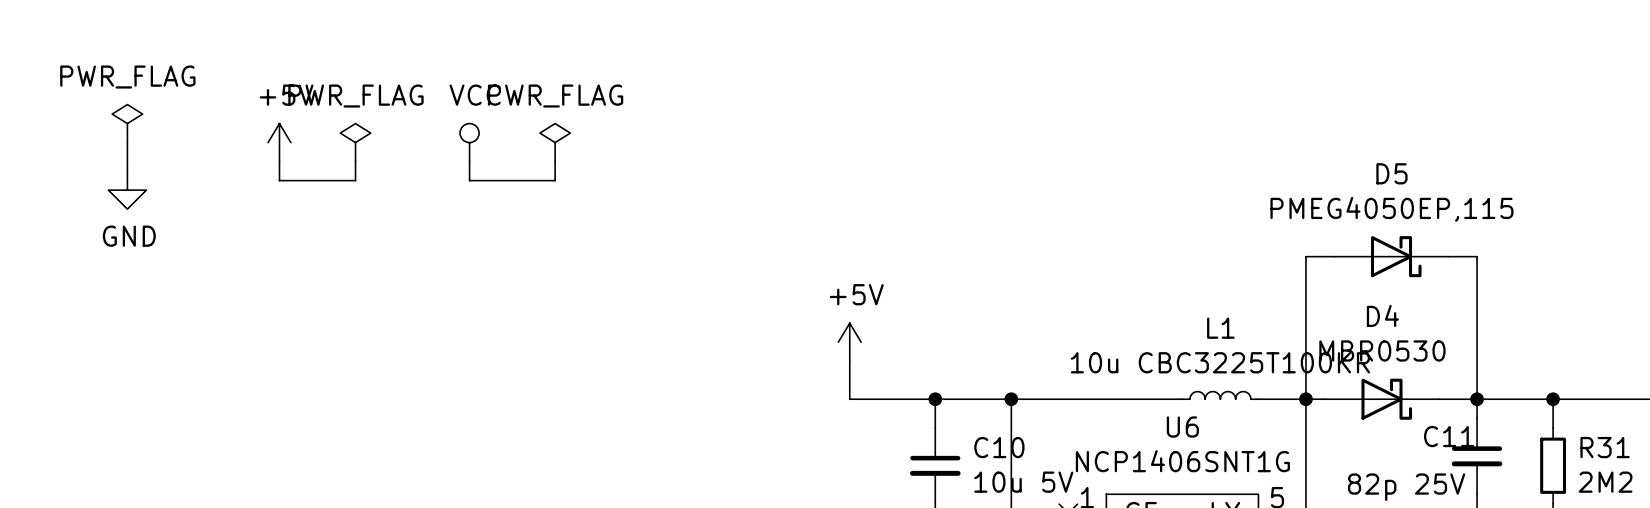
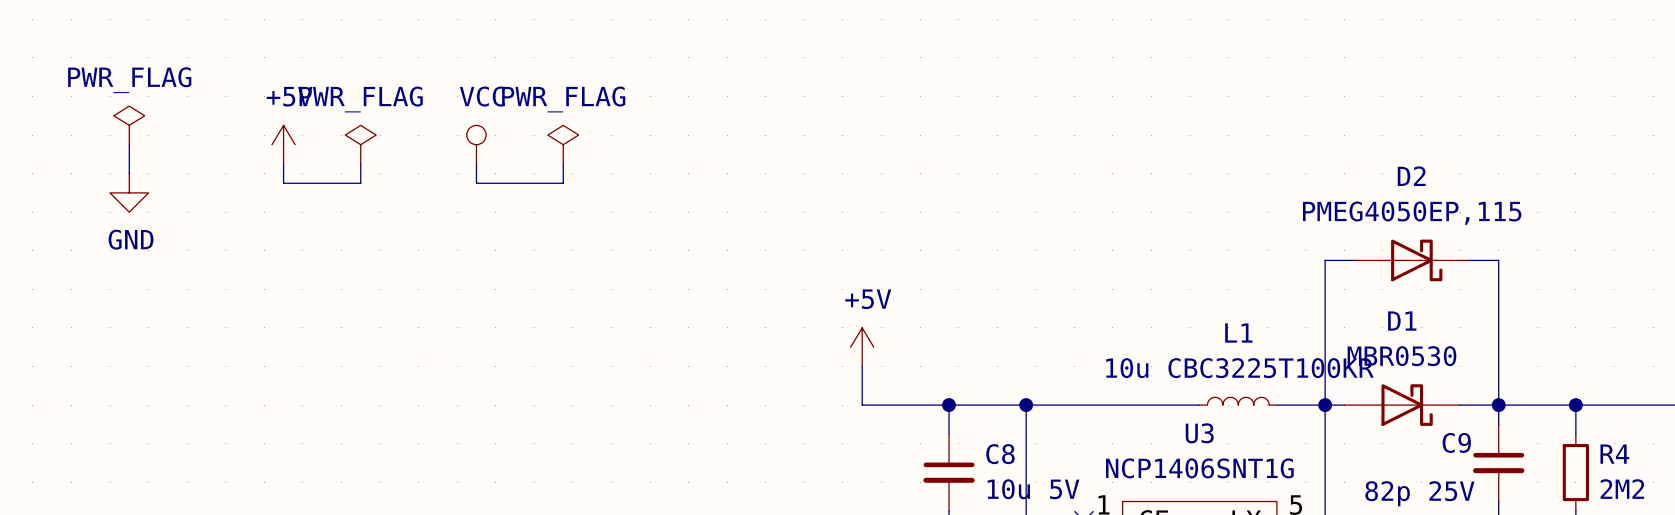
D5 name: D5 (1391, 173) -> D2 (1411, 176)
D4 name: D4 (1382, 315) -> D1 (1402, 321)
U6 name: U6 (1182, 427) -> U3 (1199, 433)
C11 name: C11 (1449, 436) -> C9 (1456, 442)
C10 name: C10 (999, 447) -> C8 (1000, 454)
R31 name: R31 (1605, 447) -> R4 (1614, 454)

